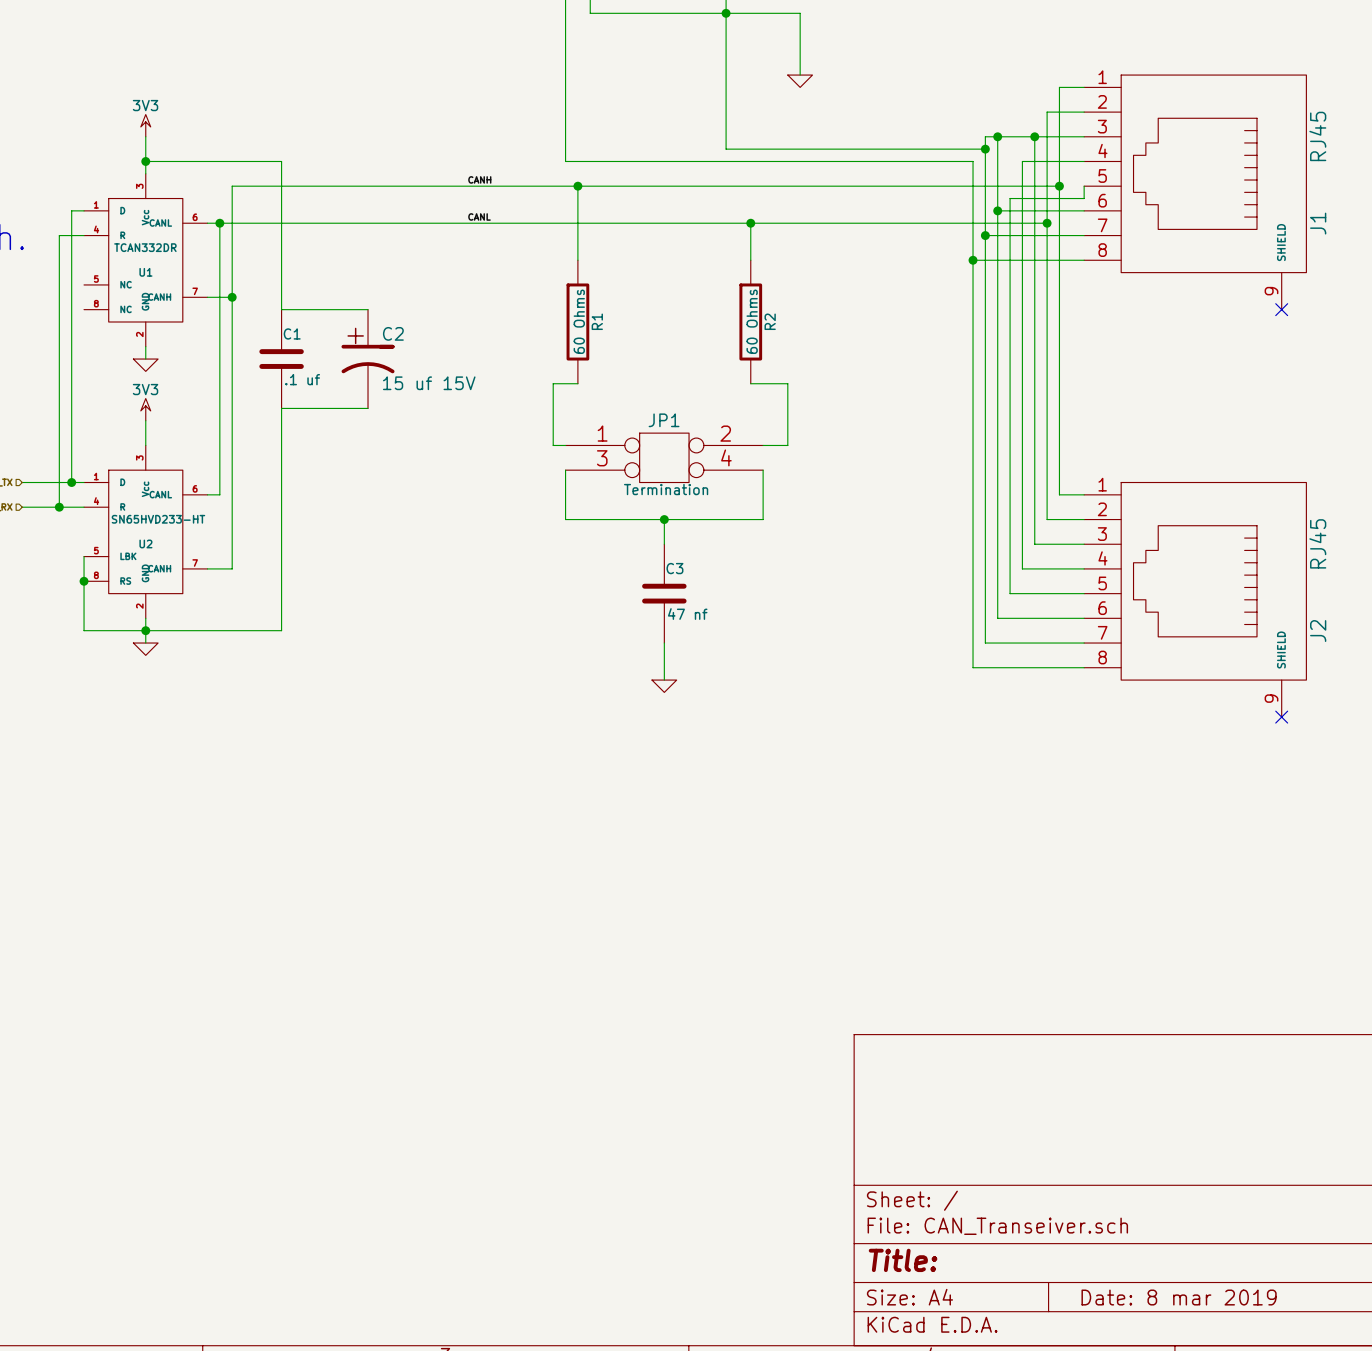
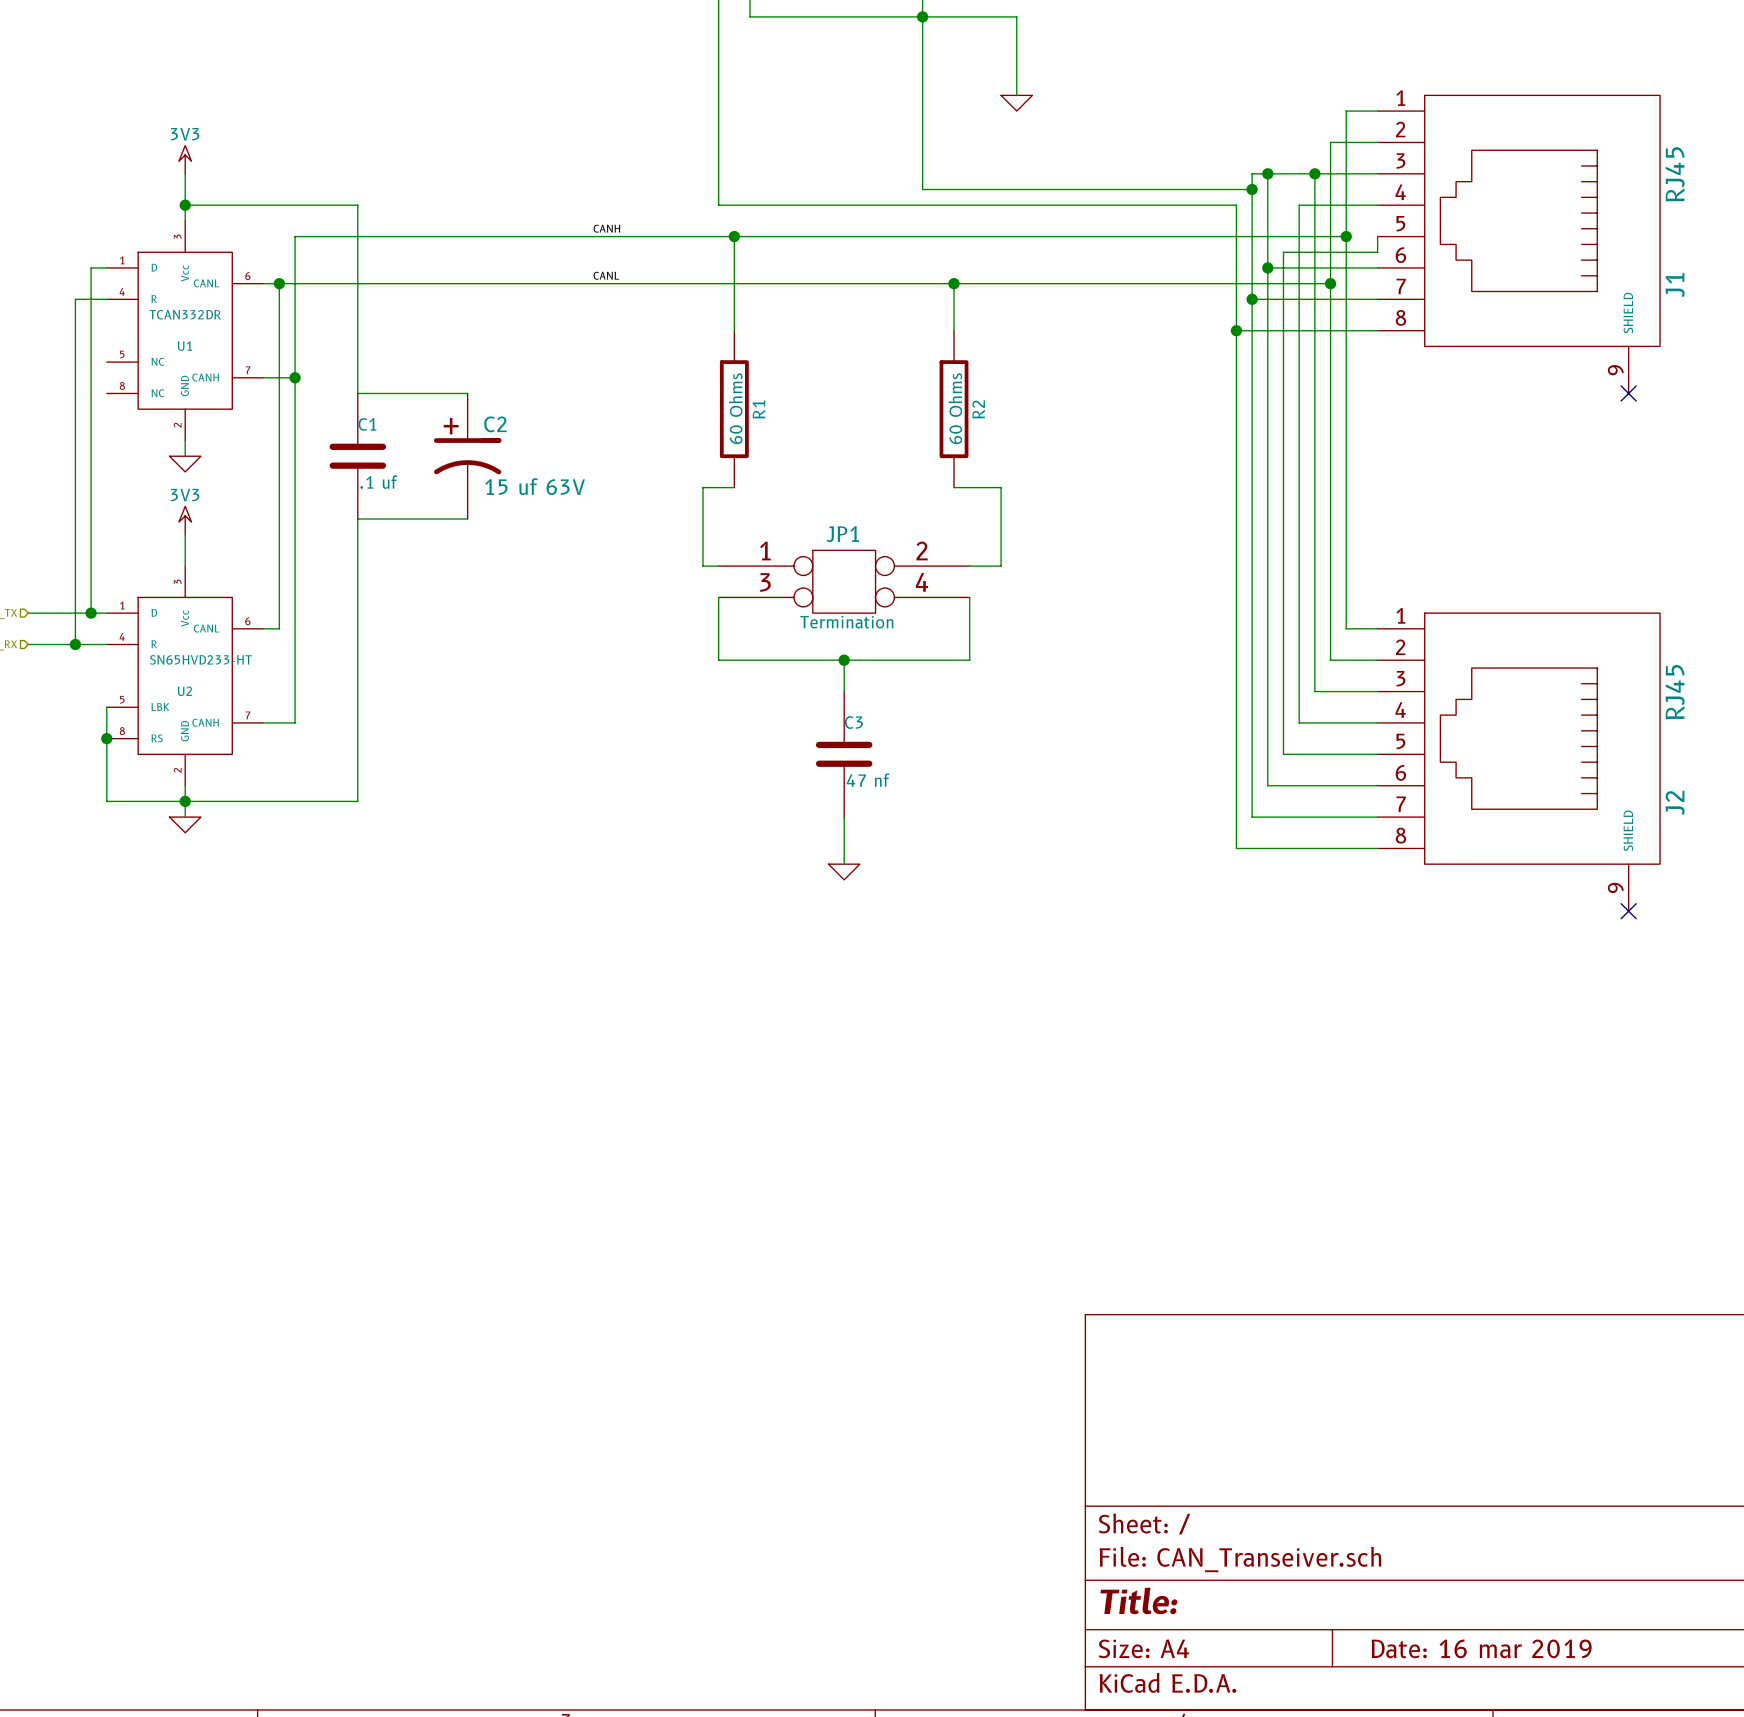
C2 value: 15 uf 15V (429, 383) -> 15 uf 63V (535, 486)
title block: Date: 8 mar 2019 (1179, 1297) -> Date: 16 mar 2019 (1481, 1648)

